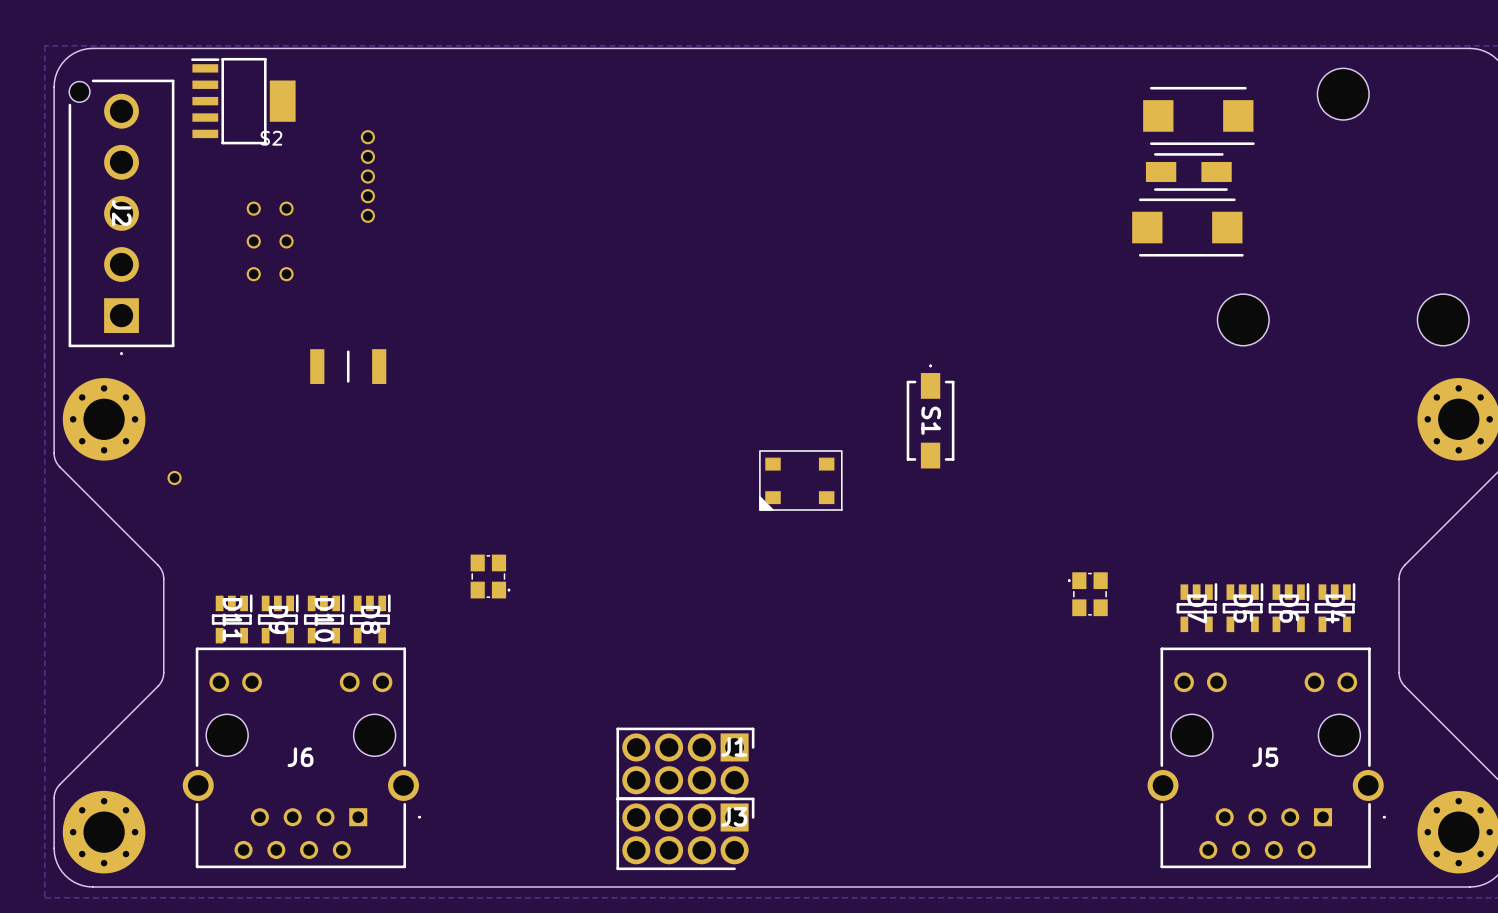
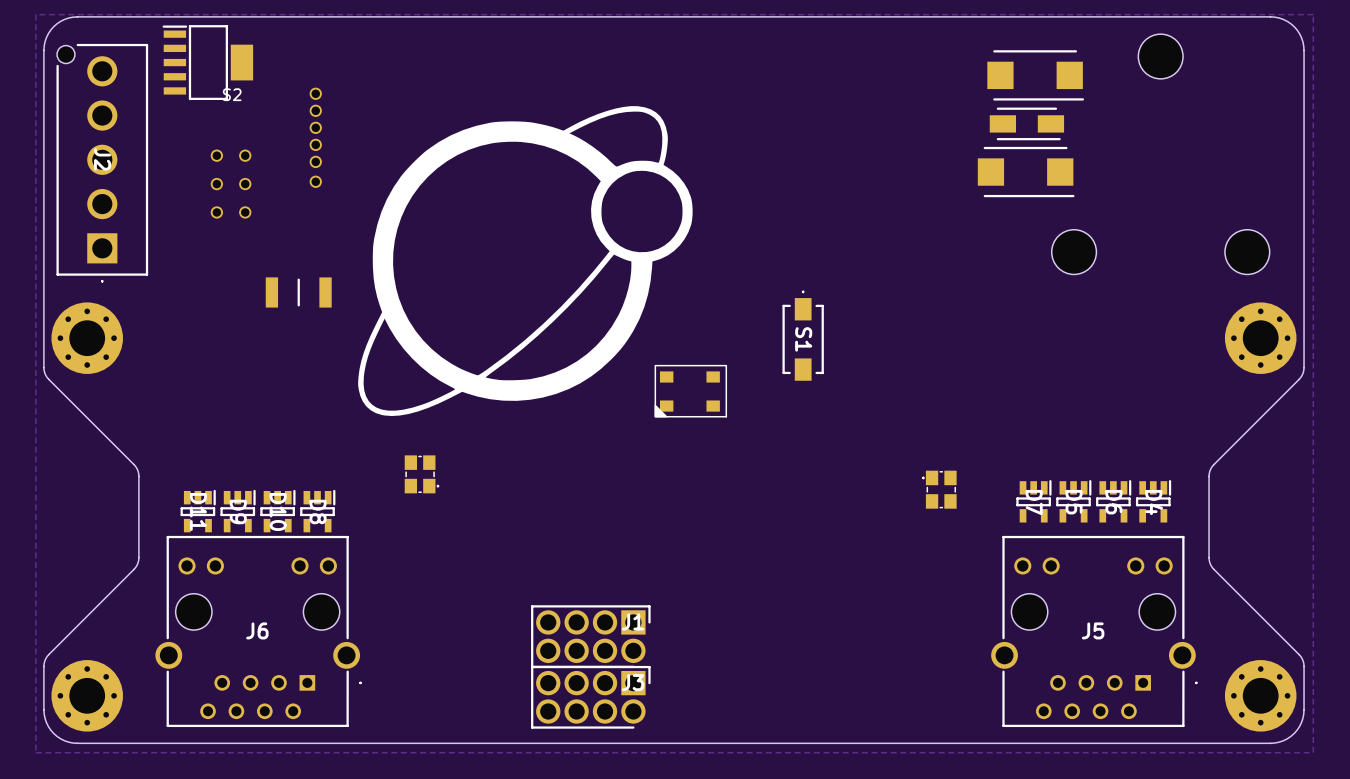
drawing: none -> [358, 106, 693, 417]
part position: (174, 477) -> (315, 181)

